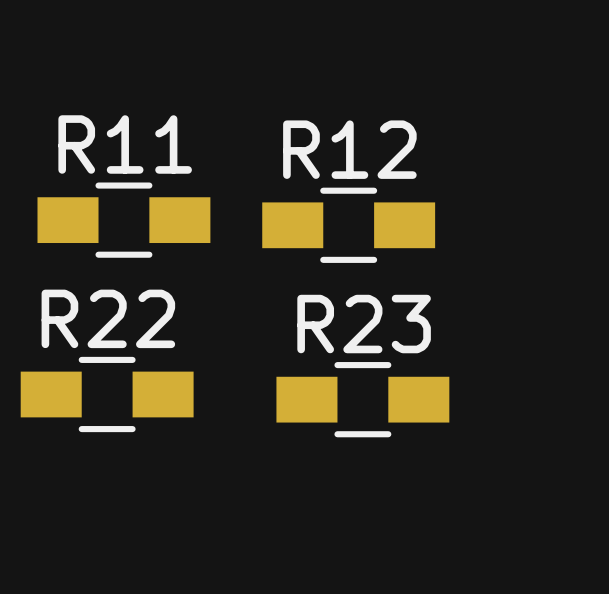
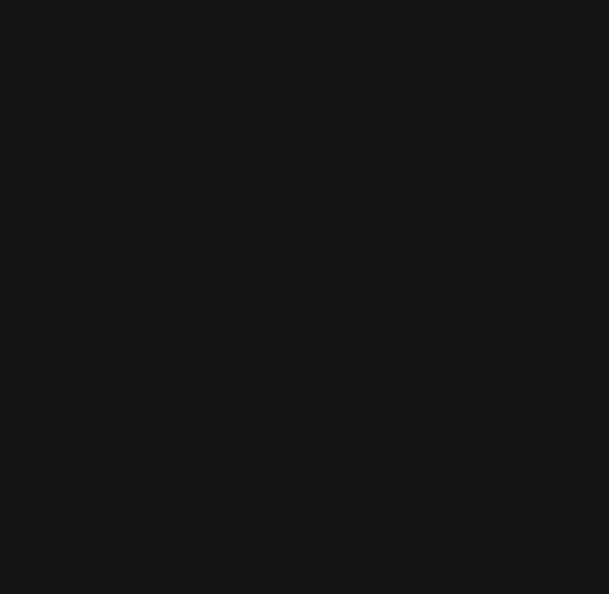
R11: (123, 220) -> none
R12: (348, 225) -> none
R22: (107, 394) -> none
R23: (362, 399) -> none

